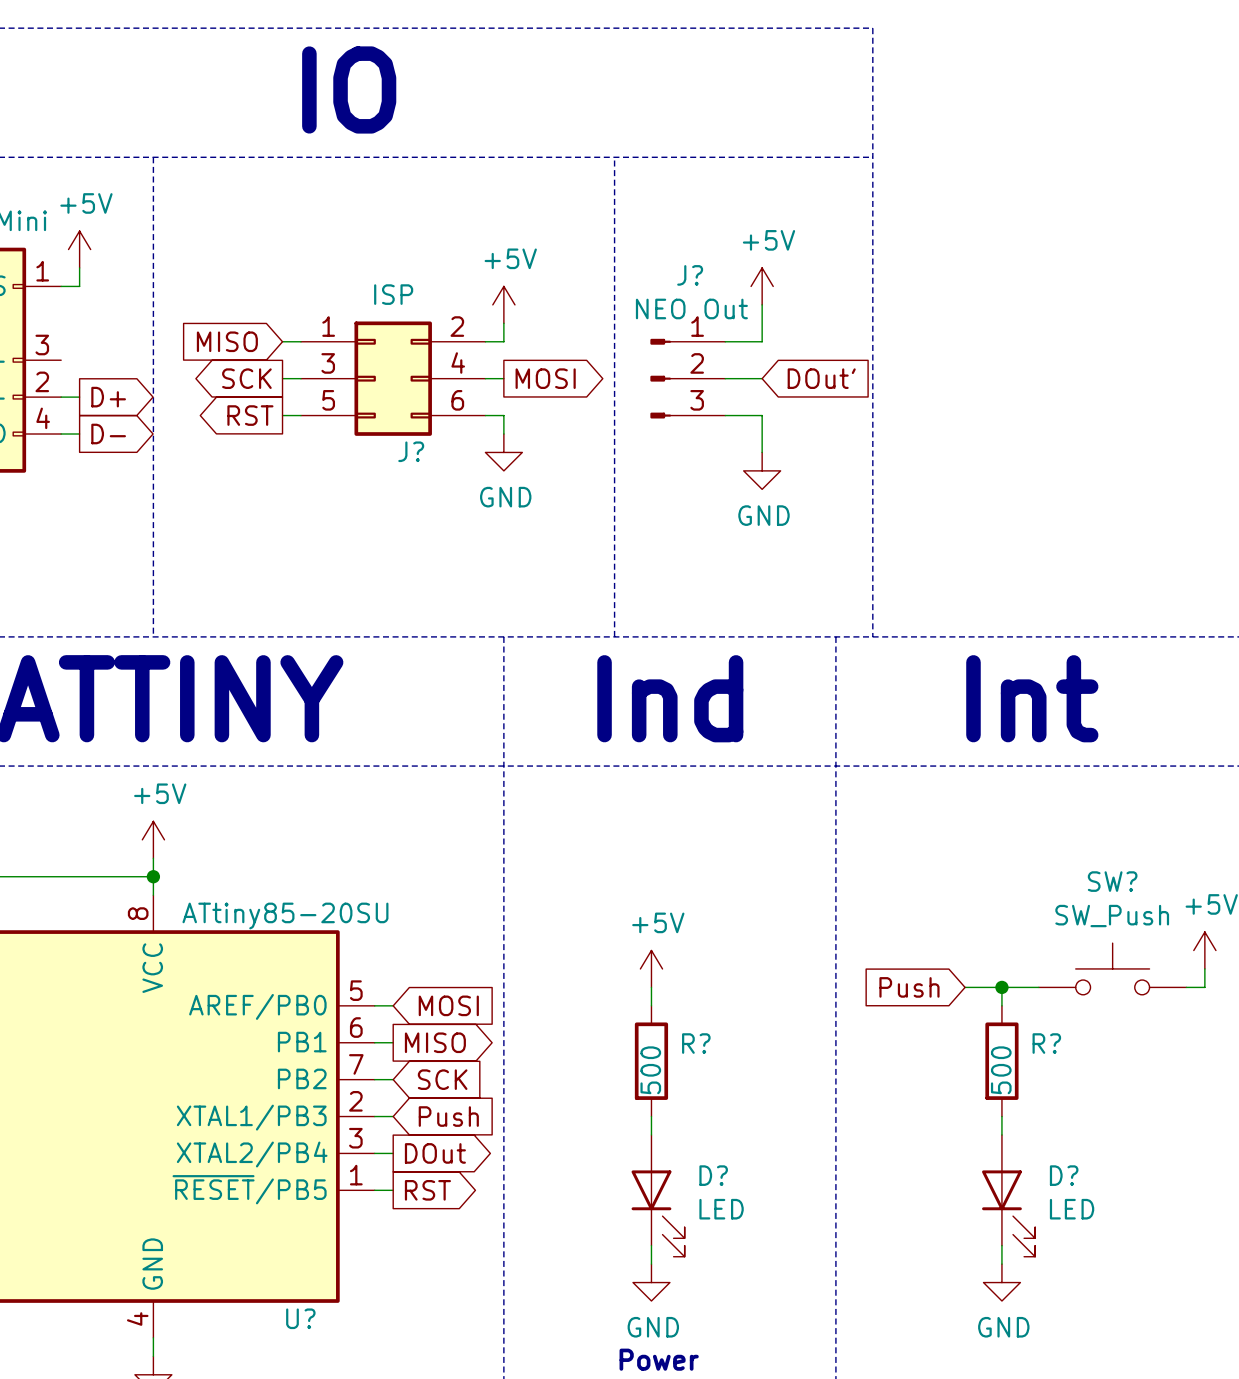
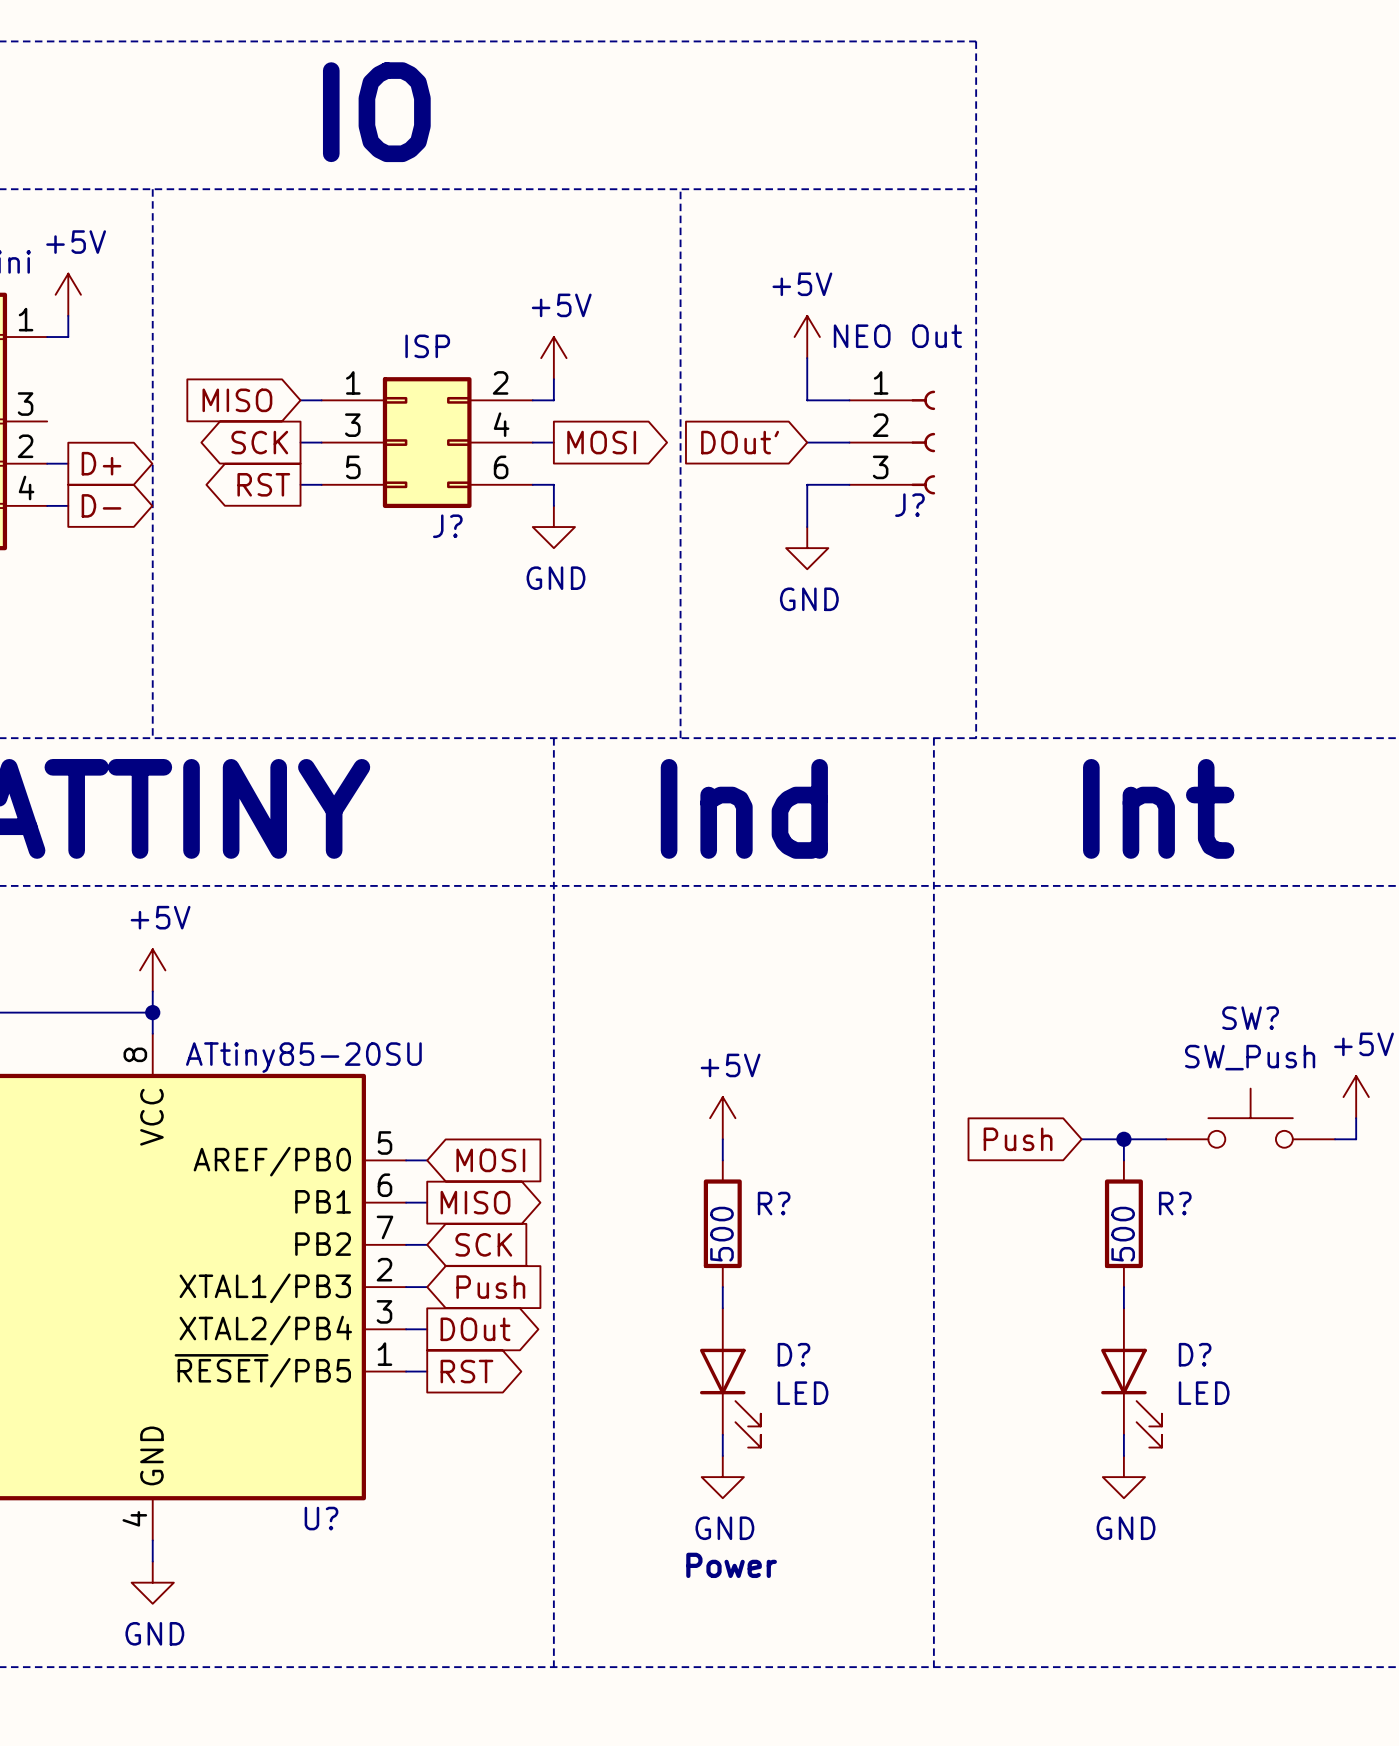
power symbol text position: +5V (769, 240) -> +5V (802, 284)
power symbol position: +5V (762, 286) -> +5V (807, 337)
wire: (762, 304) (762, 341) -> (807, 358) (807, 400)
J?: NEO Out (687, 378) -> none
J?: none -> NEO Out (892, 442)
global label rotation: 0° (821, 378) -> 180° (740, 442)
global label position: DOut' (821, 378) -> DOut' (740, 442)
wire: (762, 415) (762, 452) -> (807, 484) (807, 527)
power symbol position: GND (762, 470) -> GND (807, 548)

